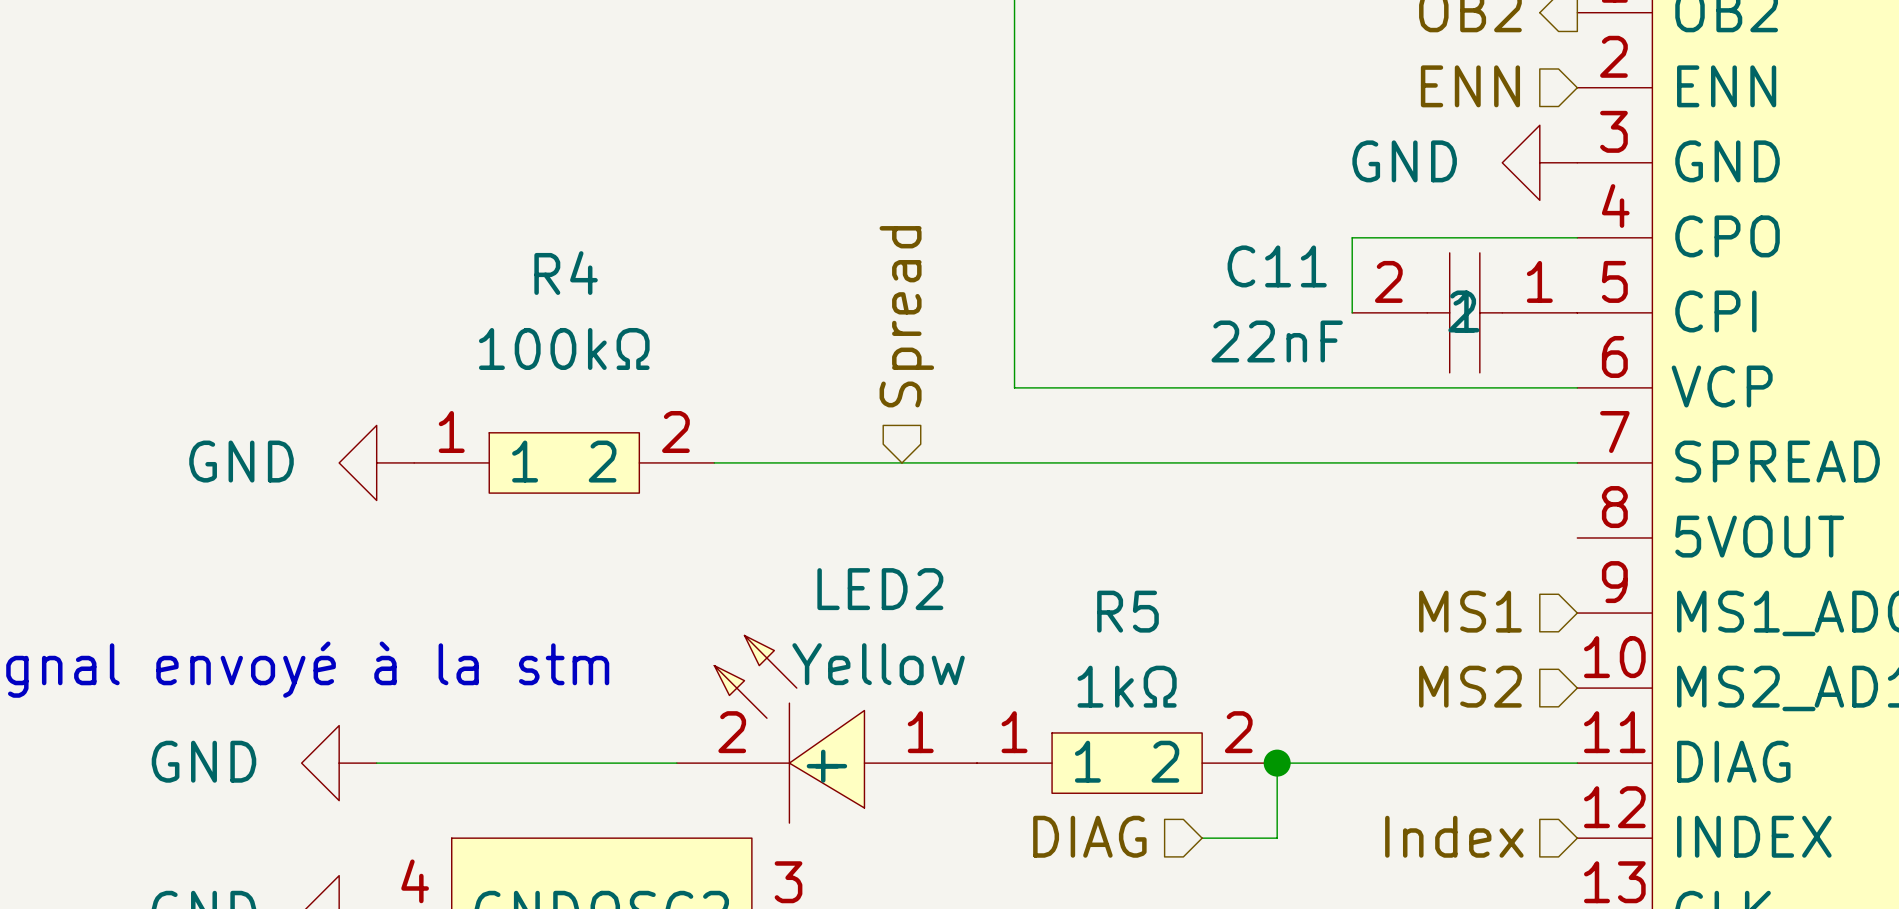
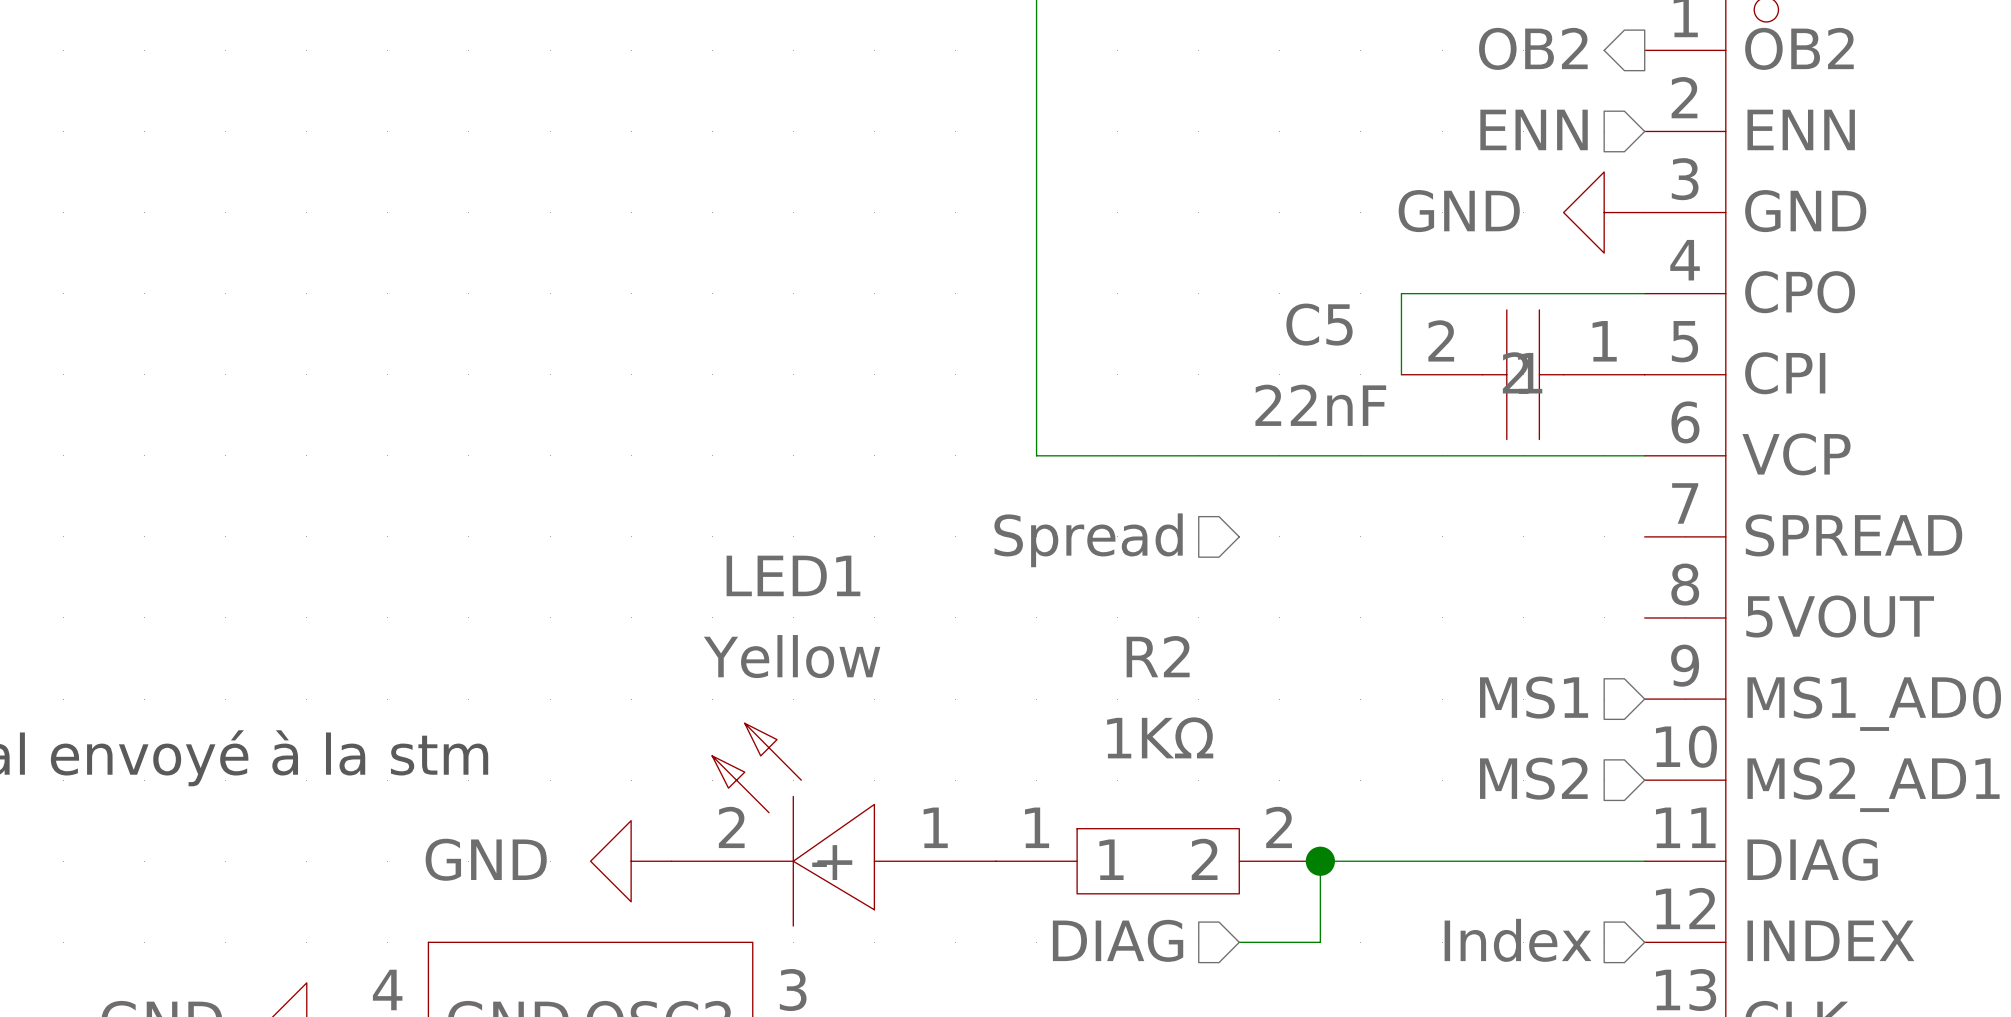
C11 name: C11 (1277, 266) -> C5 (1319, 324)
hierarchical label rotation: 0° (906, 316) -> 90° counterclockwise (1088, 540)
power symbol: GND (376, 462) -> none
R4: 100kΩ (564, 462) -> none
wire: (714, 462) (1577, 462) -> none
LED2 name: LED2 (880, 589) -> LED1 (793, 575)
R5 name: R5 (1127, 611) -> R2 (1158, 656)
LED2 value position: Yellow (878, 664) -> Yellow (792, 656)
R5 value: 1kΩ (1127, 686) -> 1KΩ (1160, 737)
power symbol: GND (339, 763) -> none
wire: (376, 763) (676, 763) -> none
power symbol: none -> GND (631, 861)

